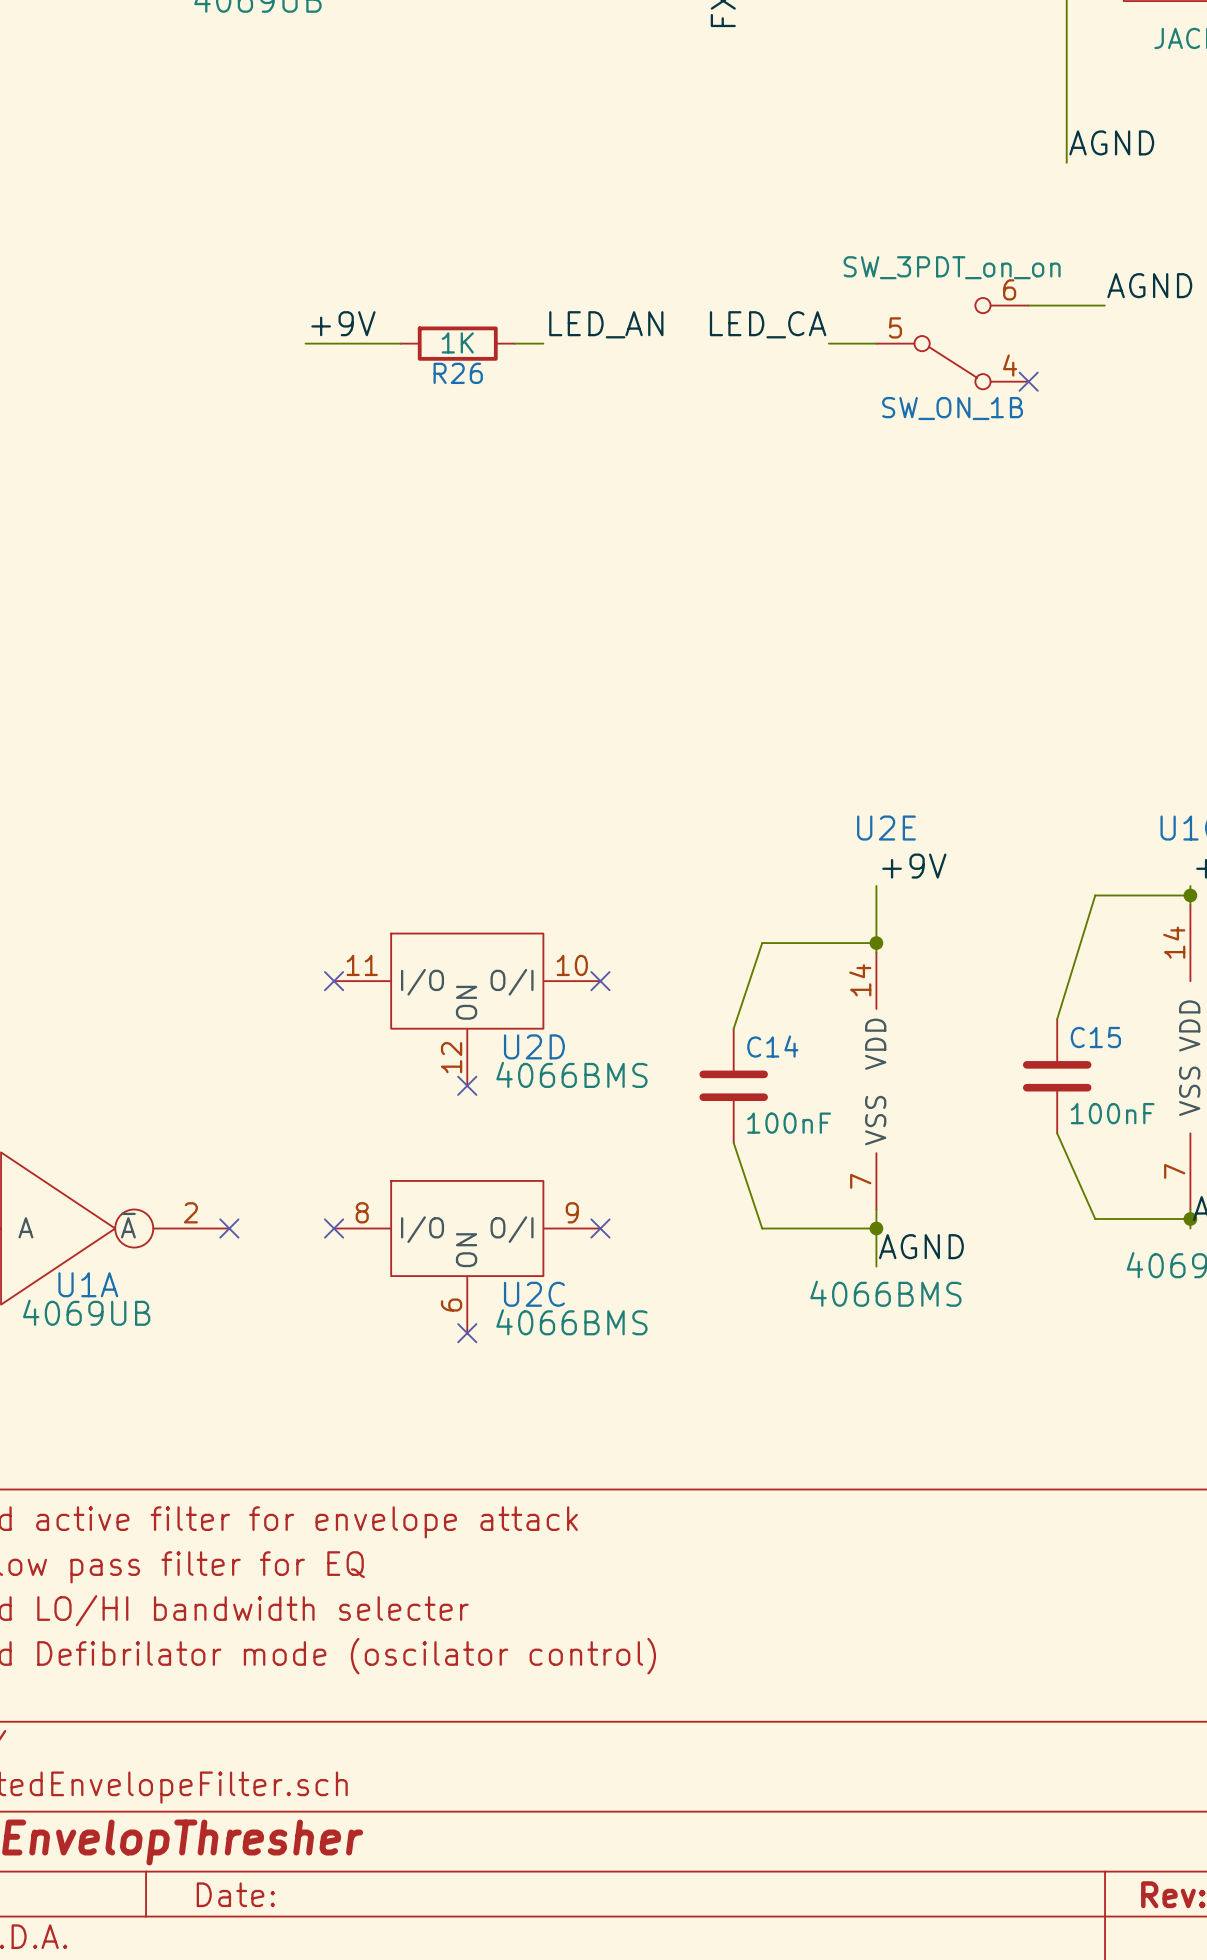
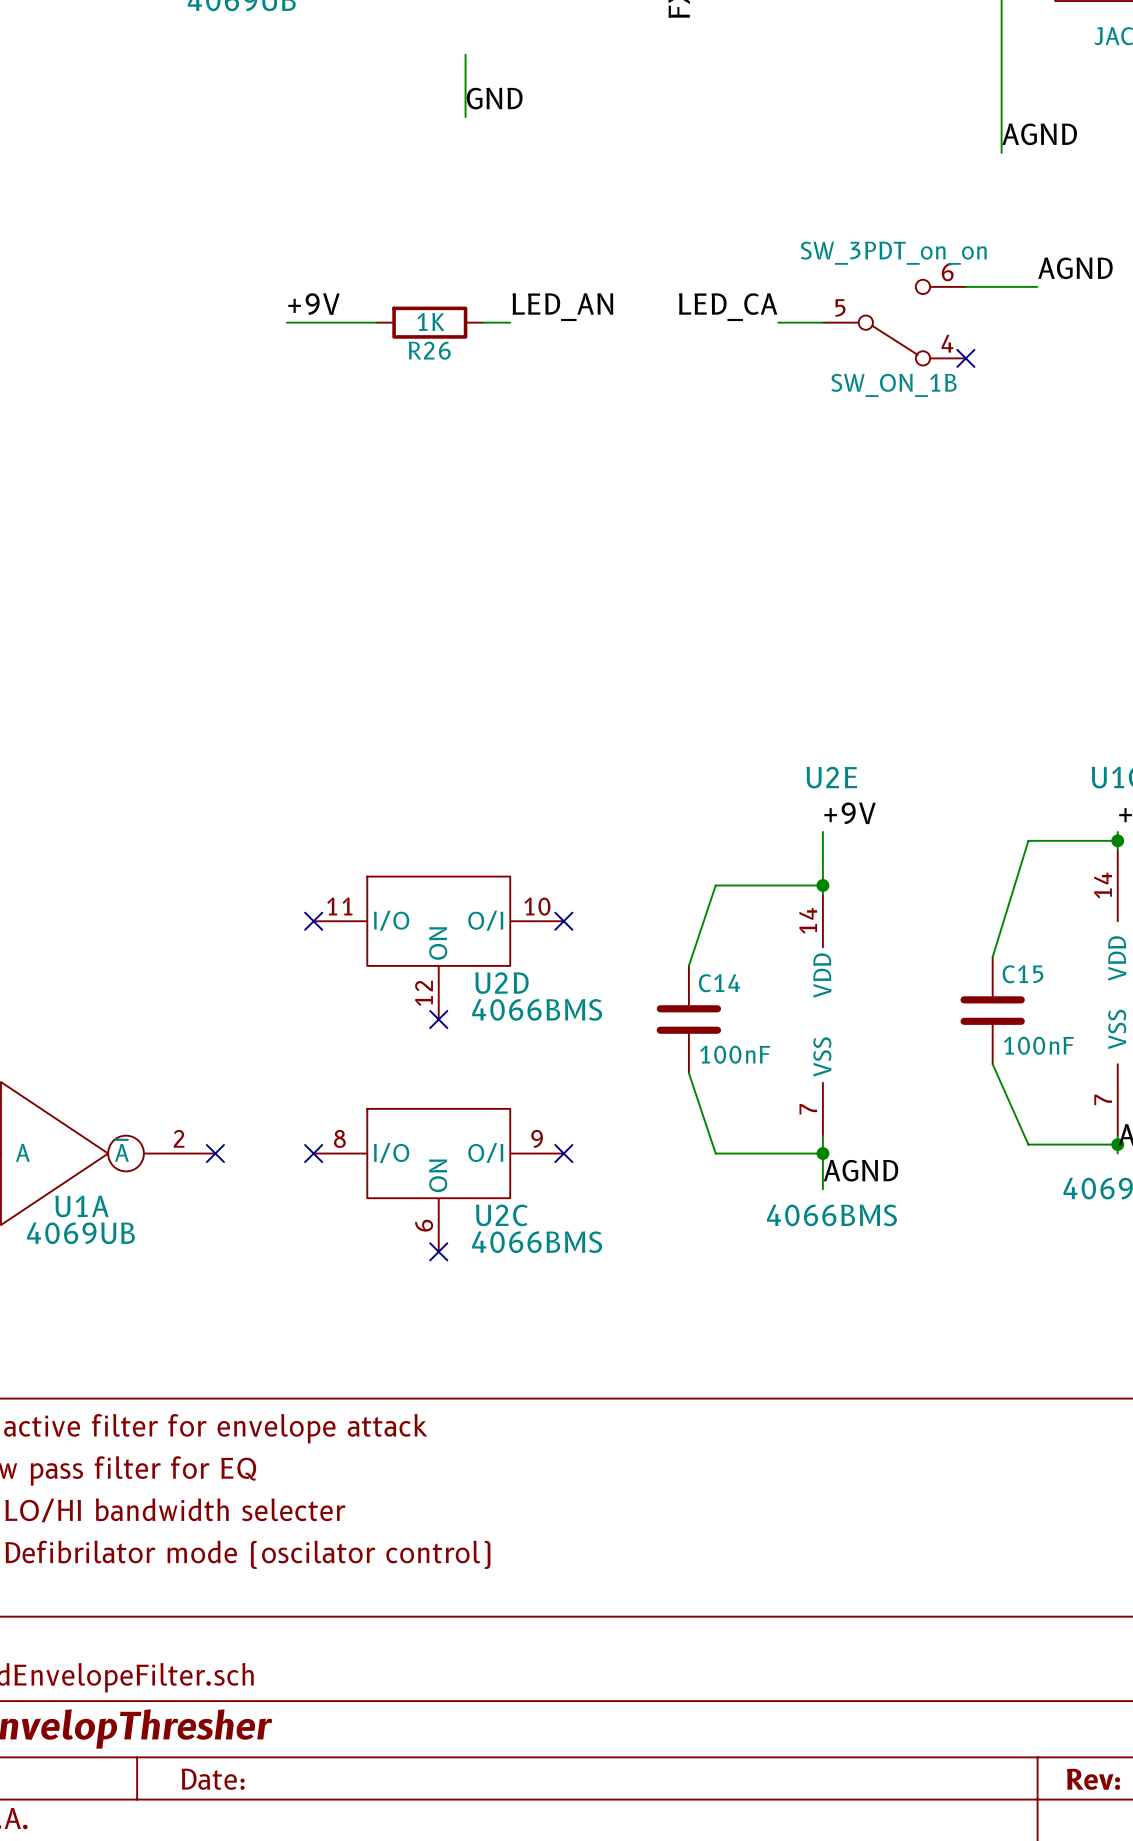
wire: none -> (465, 54) (465, 117)
label: none -> GND (494, 98)

